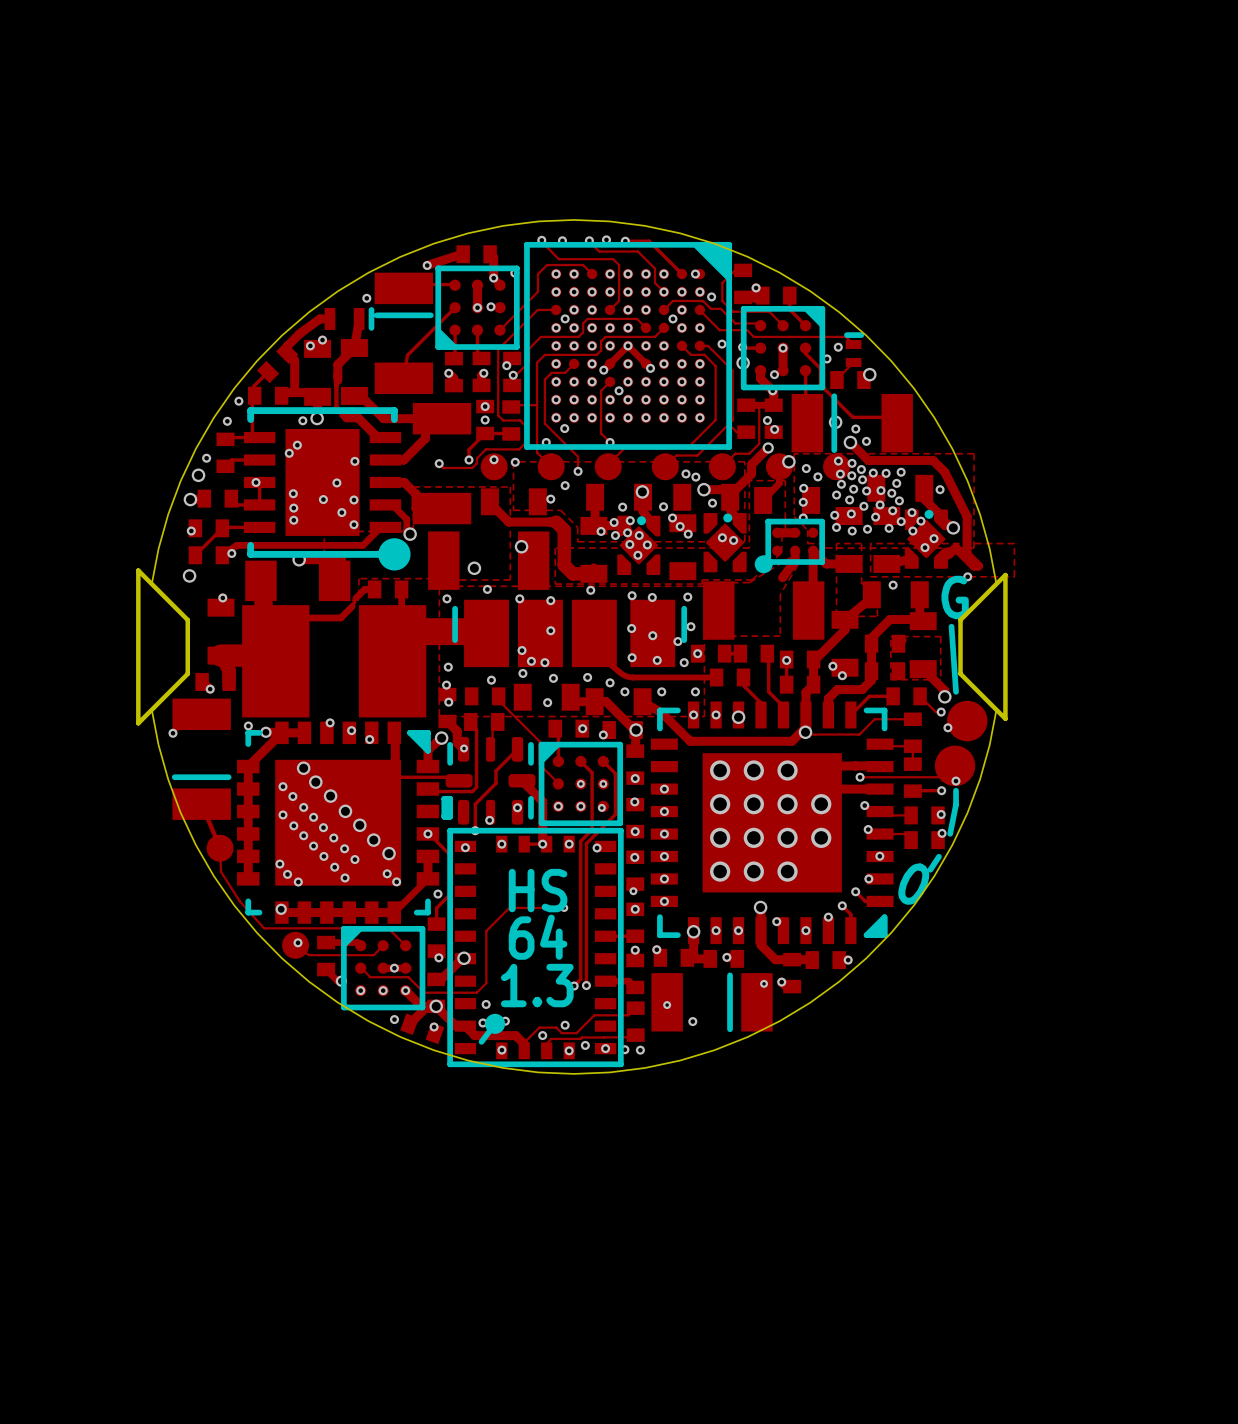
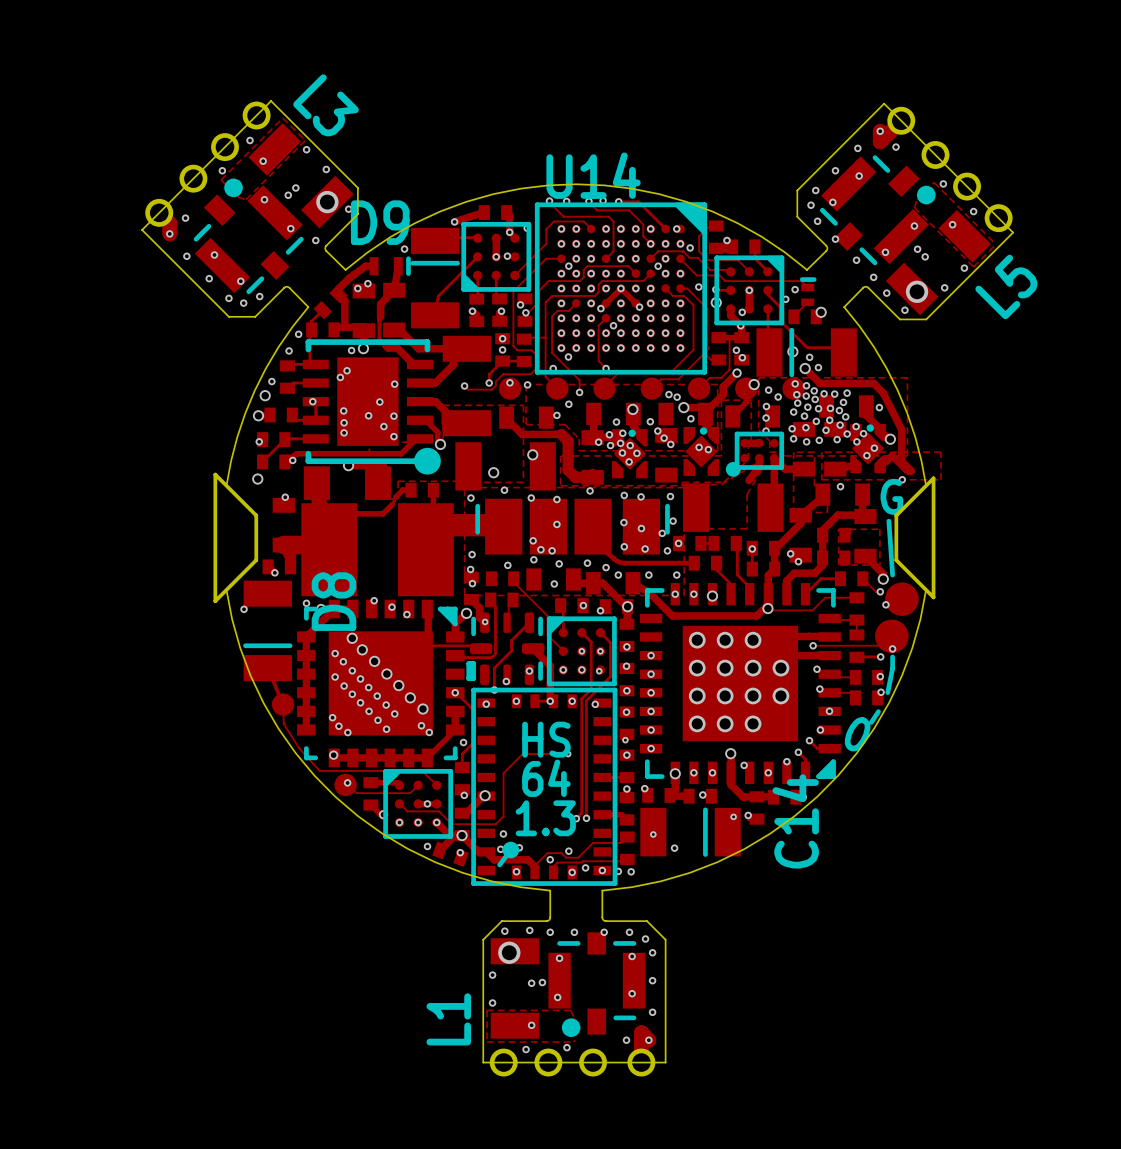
zone outline: none -> (282, 118) (221, 179) (238, 197) (246, 199) (305, 140) (282, 118)
track: none -> (901, 120) (880, 141) (880, 131)
via: none -> (880, 131)
via: none -> (250, 140)
via: none -> (896, 147)
via: none -> (857, 148)
via: none -> (306, 149)
via: none -> (263, 161)
part: none -> (207, 164)
via: none -> (326, 169)
part: none -> (949, 169)
via: none -> (222, 170)
via: none -> (835, 170)
L3: none -> (301, 175)
U14 name: none -> U14 (593, 175)
via: none -> (859, 176)
zone outline: none -> (934, 182) (995, 244) (973, 266) (914, 207) (917, 199) (934, 182)
via: none -> (943, 183)
via: none -> (295, 188)
via: none -> (815, 190)
via: none -> (288, 195)
via: none -> (264, 199)
via: none -> (327, 202)
via: none -> (832, 202)
via: none -> (811, 205)
via: none -> (348, 209)
part: none -> (877, 210)
via: none -> (973, 211)
track: none -> (159, 212) (169, 223) (169, 233)
via: none -> (185, 218)
via: none -> (817, 221)
D9 name: none -> D9 (380, 222)
via: none -> (952, 224)
via: none -> (914, 226)
via: none -> (290, 228)
via: none -> (169, 233)
part: none -> (248, 236)
via: none -> (835, 239)
via: none -> (315, 240)
via: none -> (917, 249)
via: none -> (885, 252)
via: none -> (214, 254)
via: none -> (186, 256)
via: none -> (925, 256)
via: none -> (856, 260)
L5: none -> (938, 262)
via: none -> (964, 268)
via: none -> (873, 277)
via: none -> (209, 278)
via: none -> (240, 281)
via: none -> (944, 287)
via: none -> (917, 291)
via: none -> (886, 293)
via: none -> (259, 296)
via: none -> (228, 298)
via: none -> (243, 303)
via: none -> (904, 310)
board edge: (151, 584) (168, 514) (195, 448) (234, 388) (282, 335) (338, 291) (400, 256) (468, 233) (538, 221) (574, 219) (609, 221) (680, 233) (747, 256) (810, 291) (866, 335) (914, 388) (952, 448) (980, 514) (996, 584) -> (226, 485) (237, 437) (254, 390) (278, 346) (308, 307) (286, 286) (255, 316) (228, 316) (142, 229) (271, 101) (357, 187) (357, 214) (325, 247) (345, 269) (390, 236) (440, 211) (466, 201) (520, 188) (576, 184) (631, 188) (686, 201) (712, 211) (761, 236) (807, 269) (827, 247) (797, 216) (797, 190) (884, 103) (1013, 232) (926, 319) (899, 319) (866, 286) (844, 307) (873, 346) (897, 390) (915, 437) (926, 485)
board edge: (151, 709) (168, 779) (195, 845) (234, 905) (282, 958) (338, 1002) (400, 1037) (468, 1060) (538, 1072) (574, 1073) (609, 1072) (680, 1060) (747, 1037) (810, 1002) (866, 958) (914, 905) (952, 845) (980, 779) (996, 709) -> (226, 589) (240, 647) (263, 702) (295, 752) (335, 797) (382, 833) (434, 862) (491, 881) (550, 890) (548, 920) (501, 921) (483, 939) (483, 1062) (665, 1062) (665, 939) (647, 921) (603, 920) (602, 890) (661, 881) (717, 862) (770, 833) (816, 797) (857, 752) (889, 702) (912, 647) (926, 589)
D8 name: none -> D8 (333, 601)
C14 name: none -> C14 (795, 821)
via: none -> (529, 930)
via: none -> (504, 931)
via: none -> (550, 932)
via: none -> (574, 932)
via: none -> (604, 932)
via: none -> (629, 932)
via: none -> (645, 938)
via: none -> (509, 952)
via: none -> (652, 952)
via: none -> (632, 956)
via: none -> (559, 958)
via: none -> (492, 975)
via: none -> (652, 980)
via: none -> (542, 982)
via: none -> (531, 983)
part: none -> (596, 984)
L1: none -> (514, 988)
via: none -> (632, 993)
via: none -> (557, 997)
via: none -> (492, 1003)
zone outline: none -> (486, 1010) (486, 1042) (574, 1042) (574, 1017) (570, 1010) (486, 1010)
via: none -> (652, 1012)
via: none -> (531, 1025)
via: none -> (626, 1040)
track: none -> (648, 1040) (641, 1032) (641, 1062)
via: none -> (648, 1040)
via: none -> (566, 1047)
via: none -> (526, 1049)
part: none -> (572, 1062)

